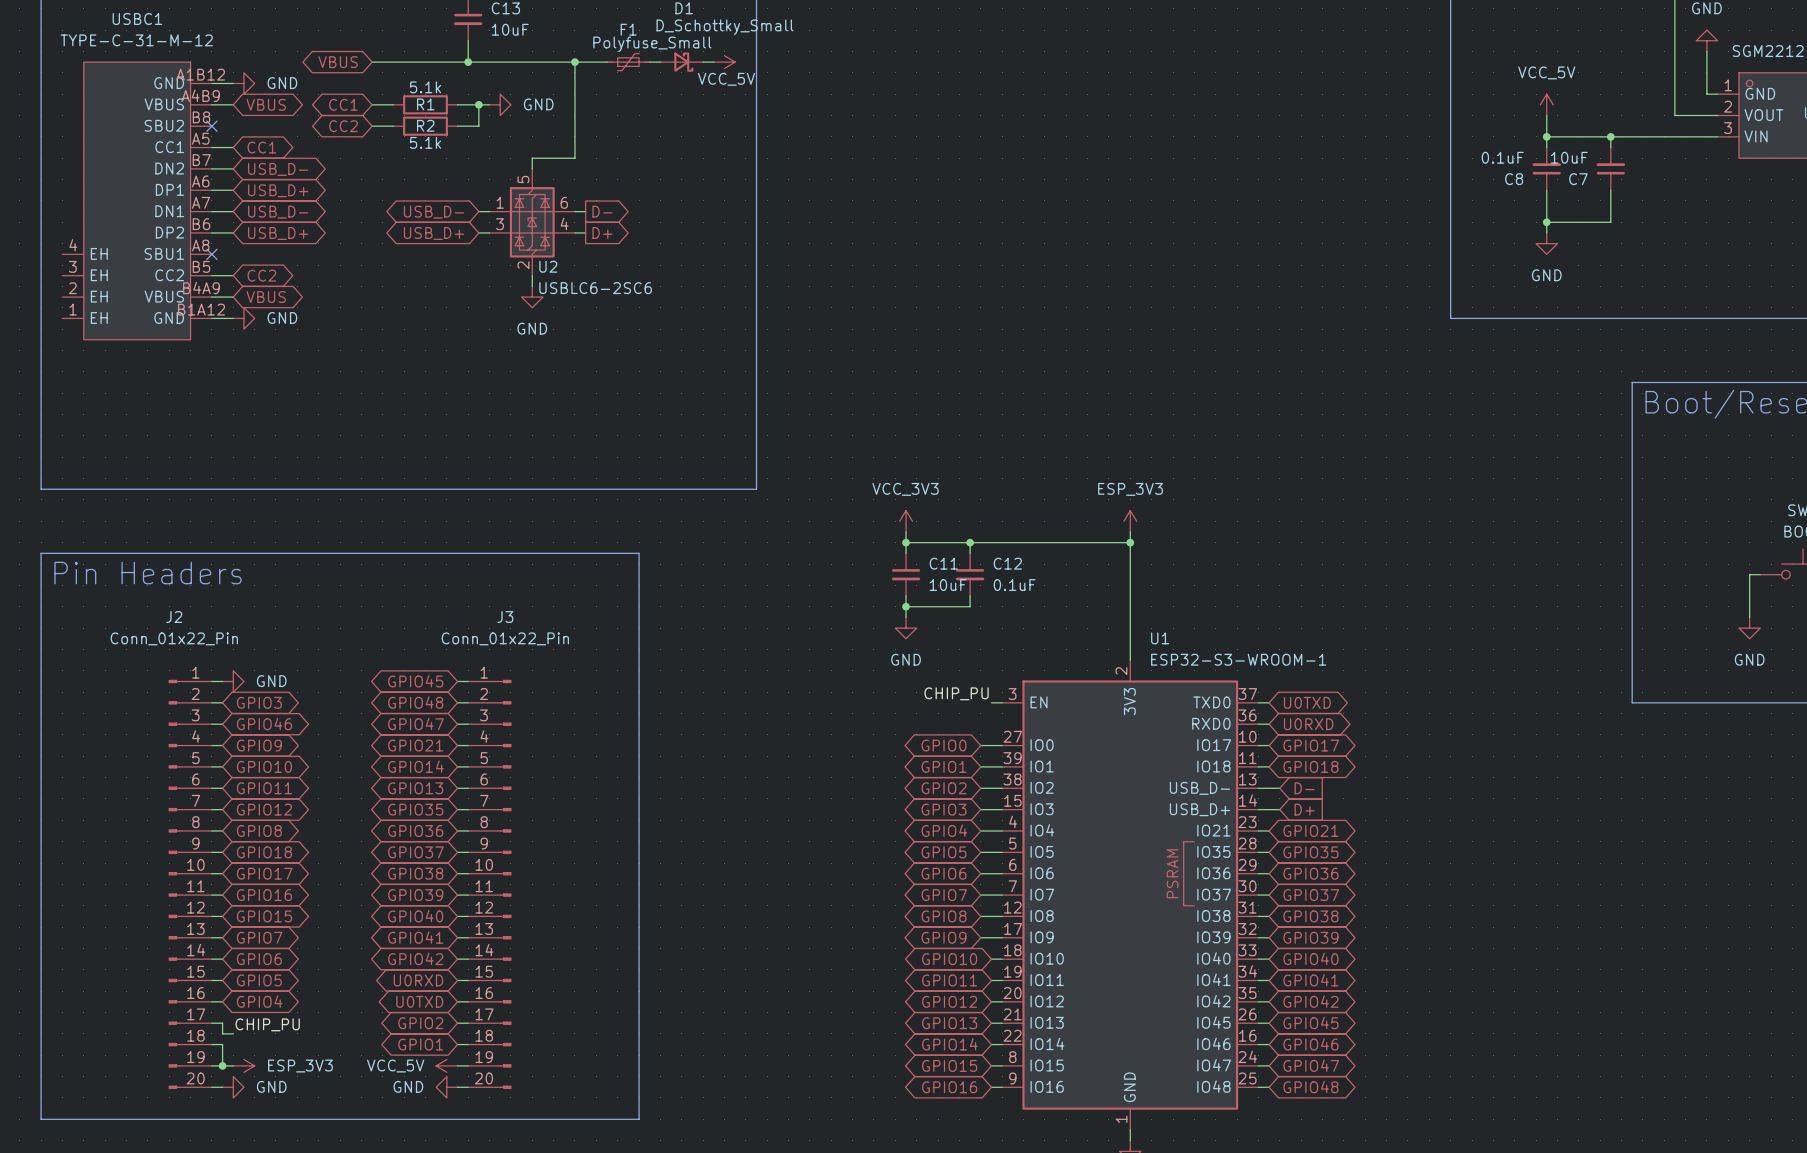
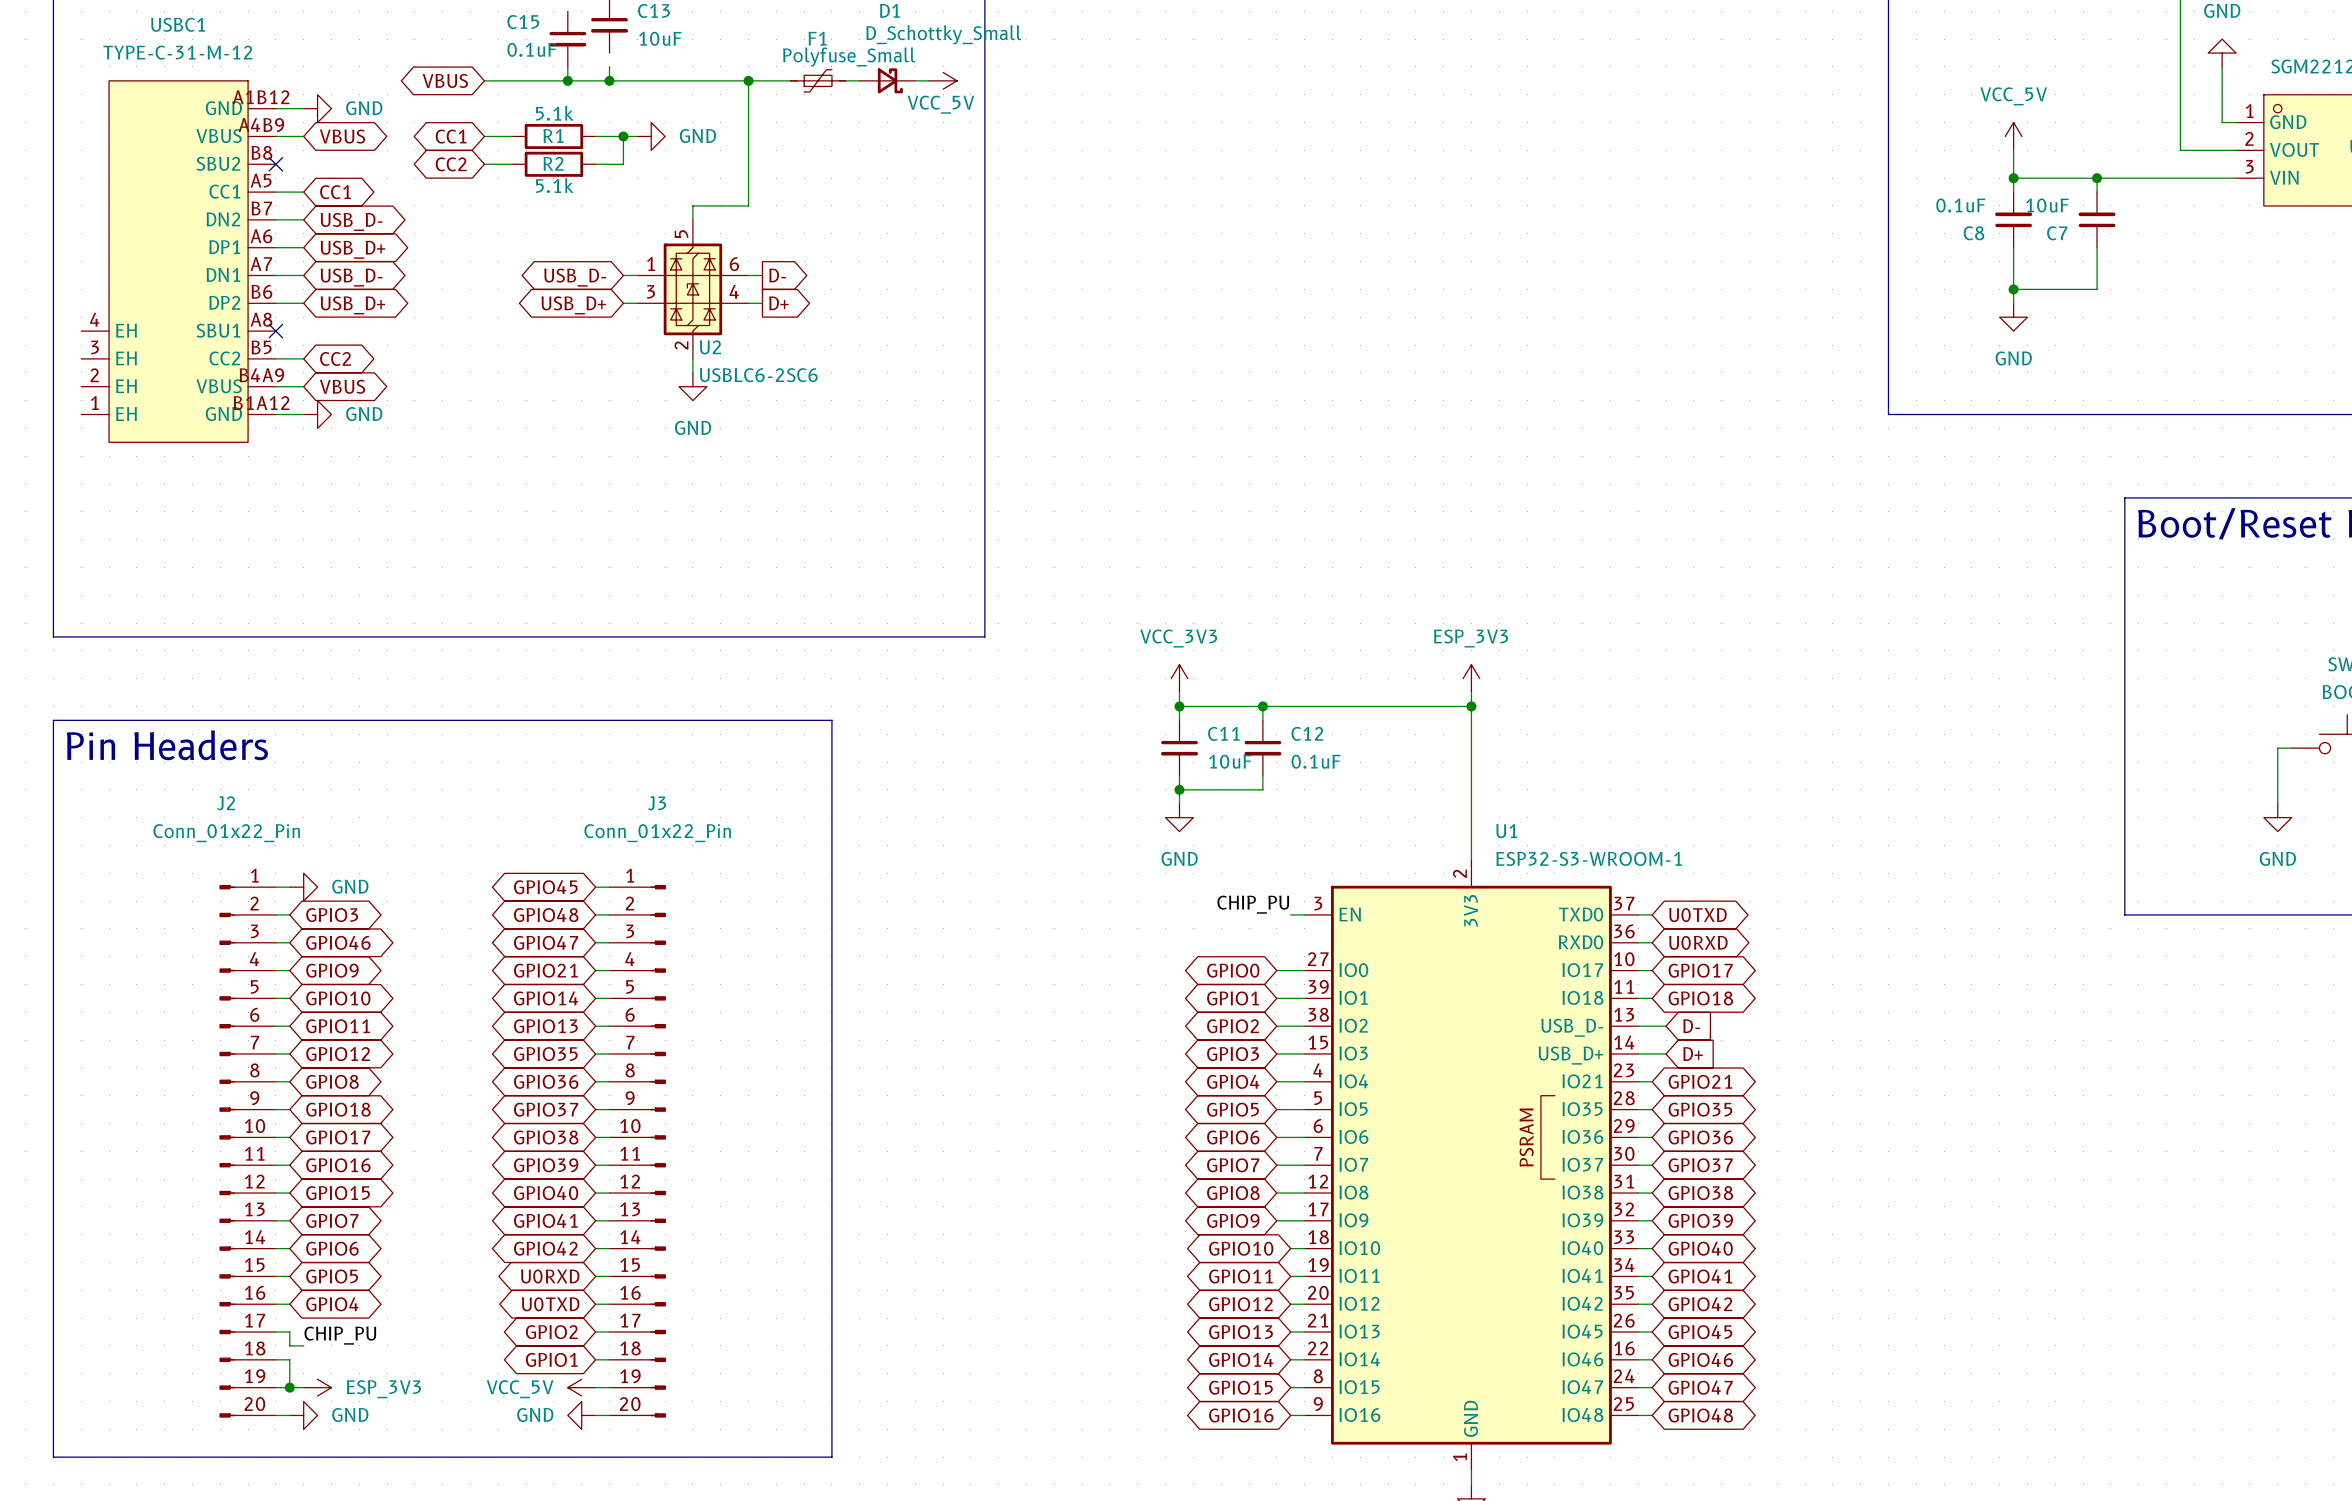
C15: none -> 0.1uF (567, 39)
wire: (468, 40) (468, 51) -> (567, 66) (567, 80)
junction: none -> (567, 80)

